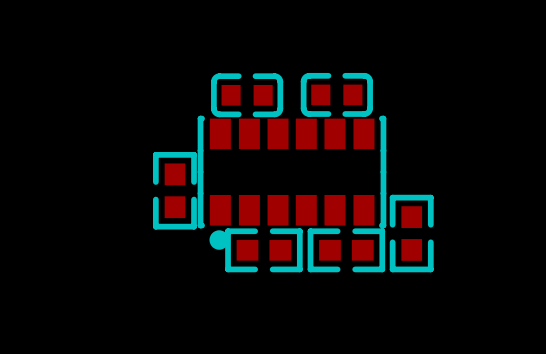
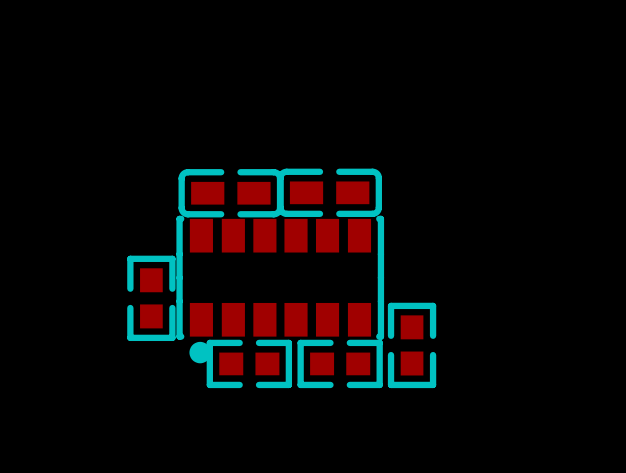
part footprint: [300, 72, 373, 117] -> [277, 168, 382, 217]
part footprint: [211, 73, 284, 118] -> [178, 169, 284, 218]

